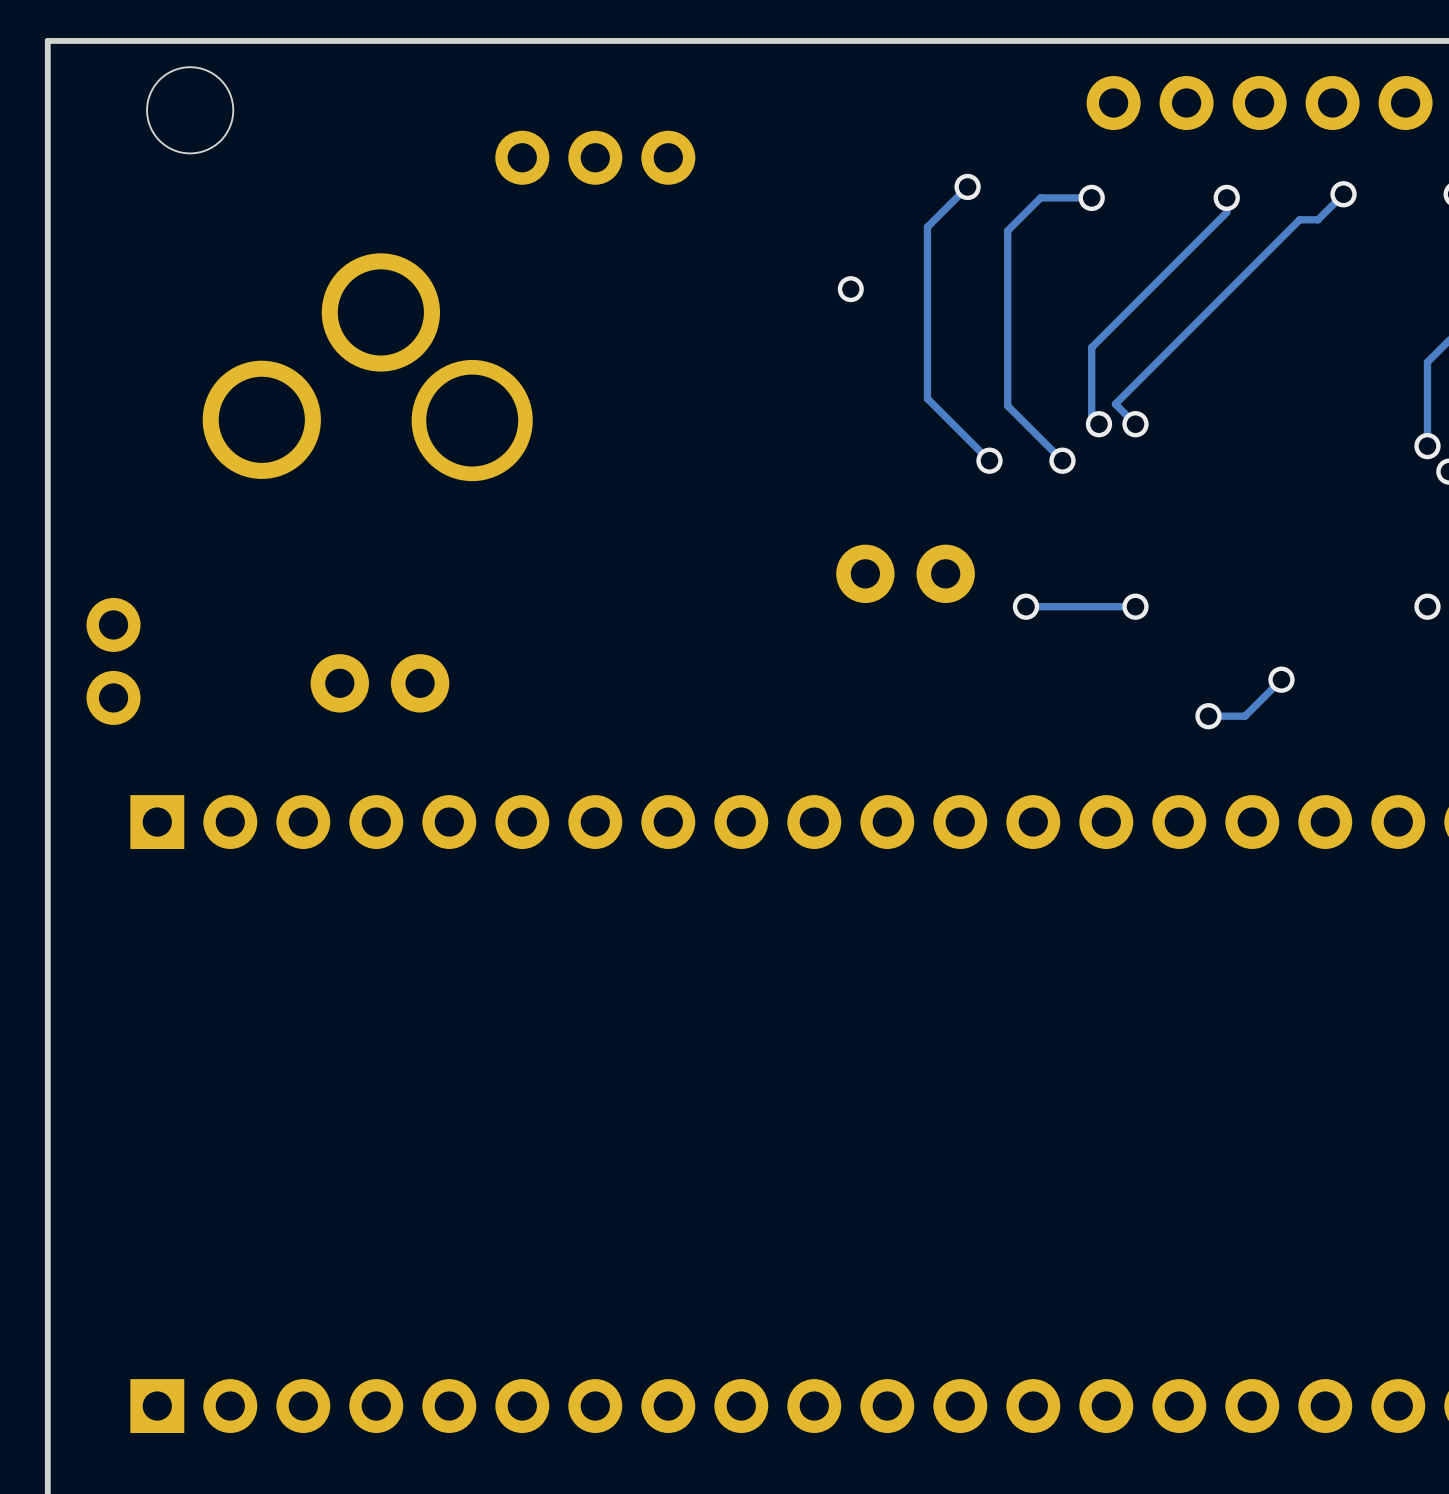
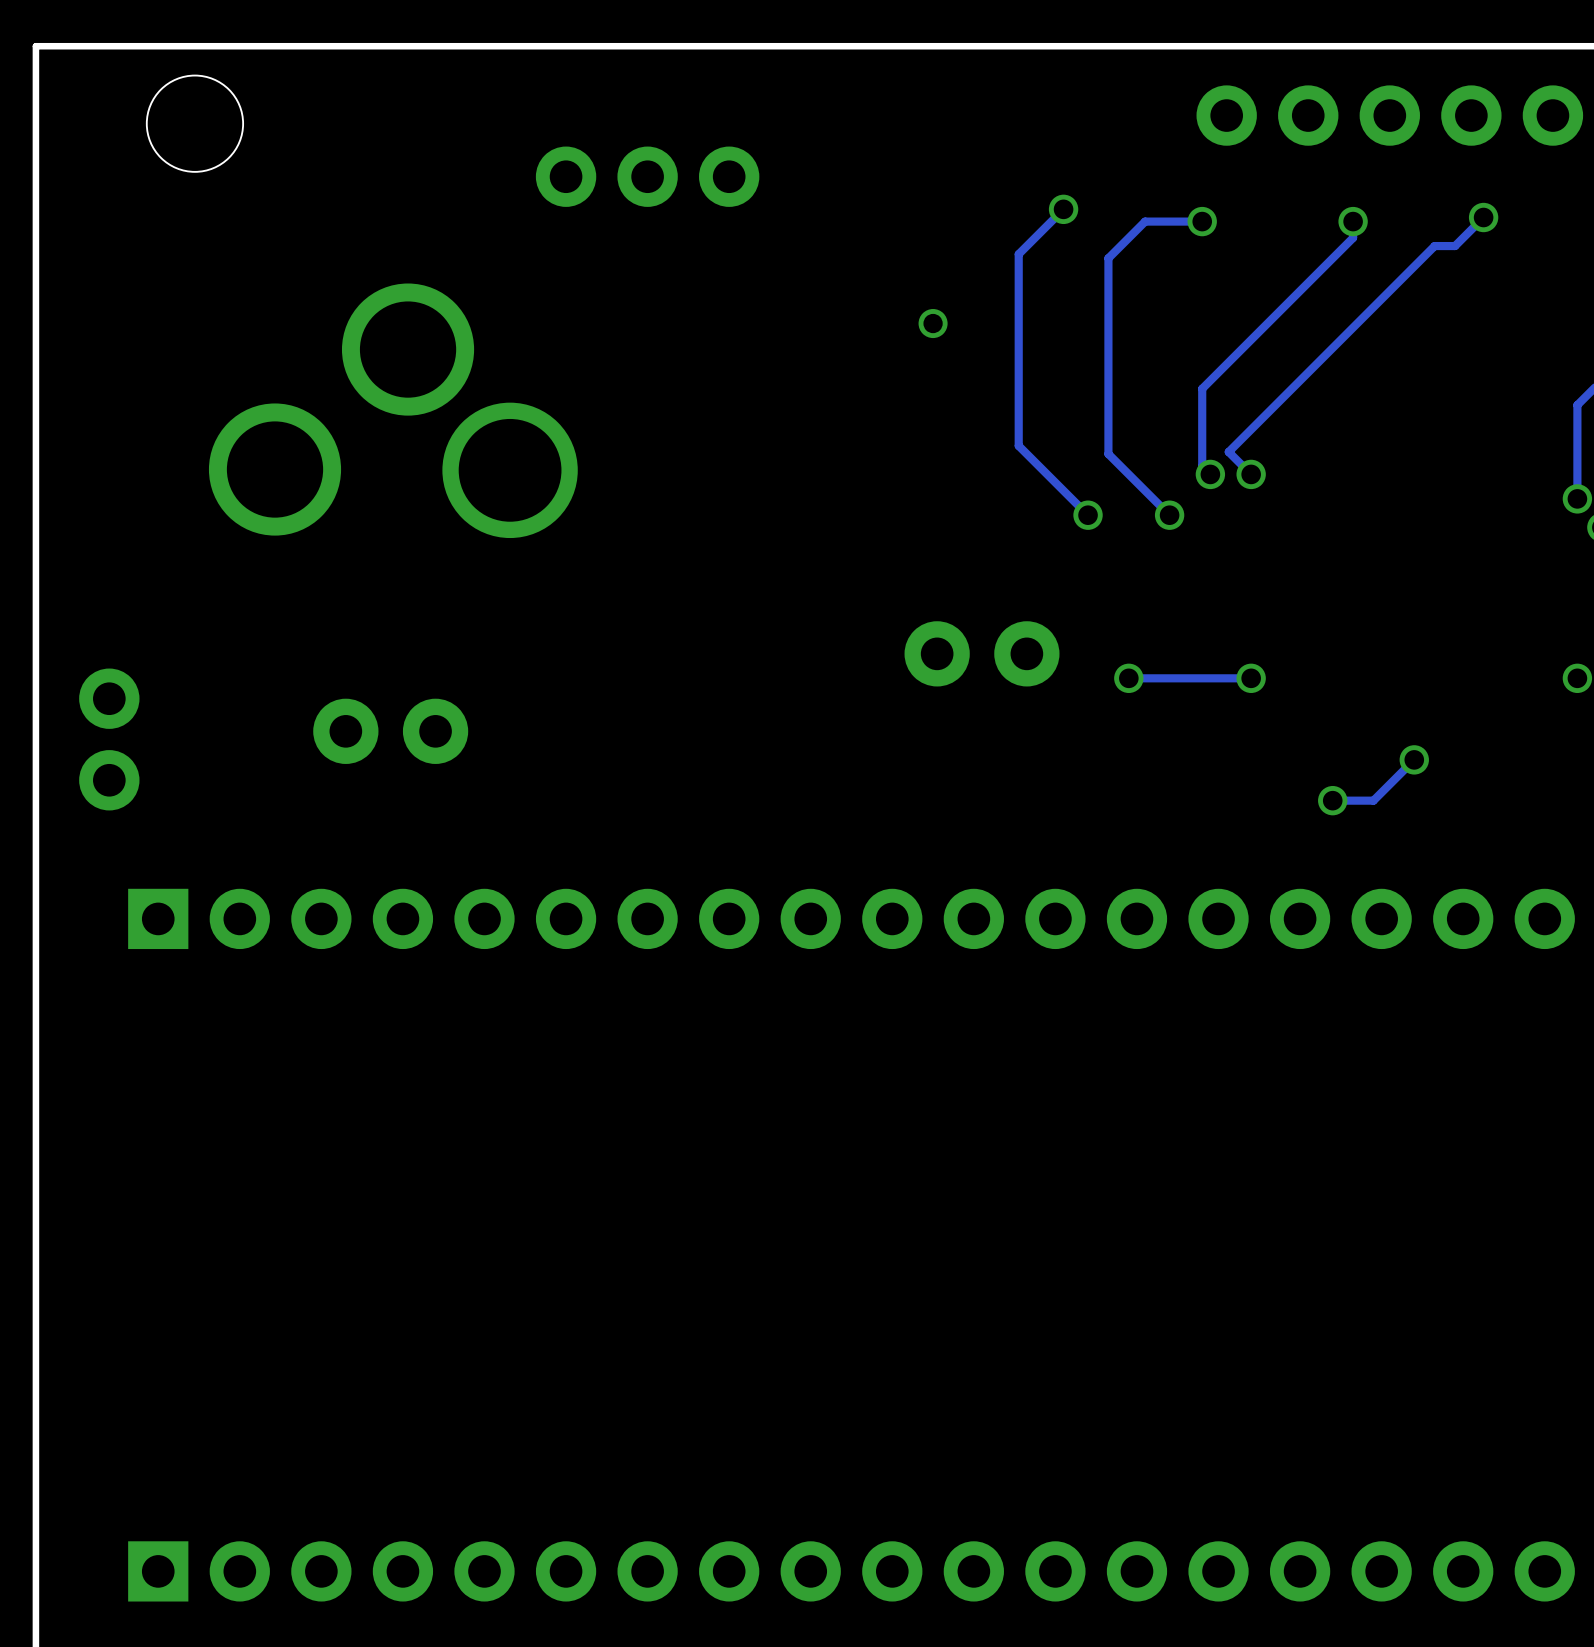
part position: (905, 573) -> (982, 653)
part position: (379, 683) -> (390, 731)

